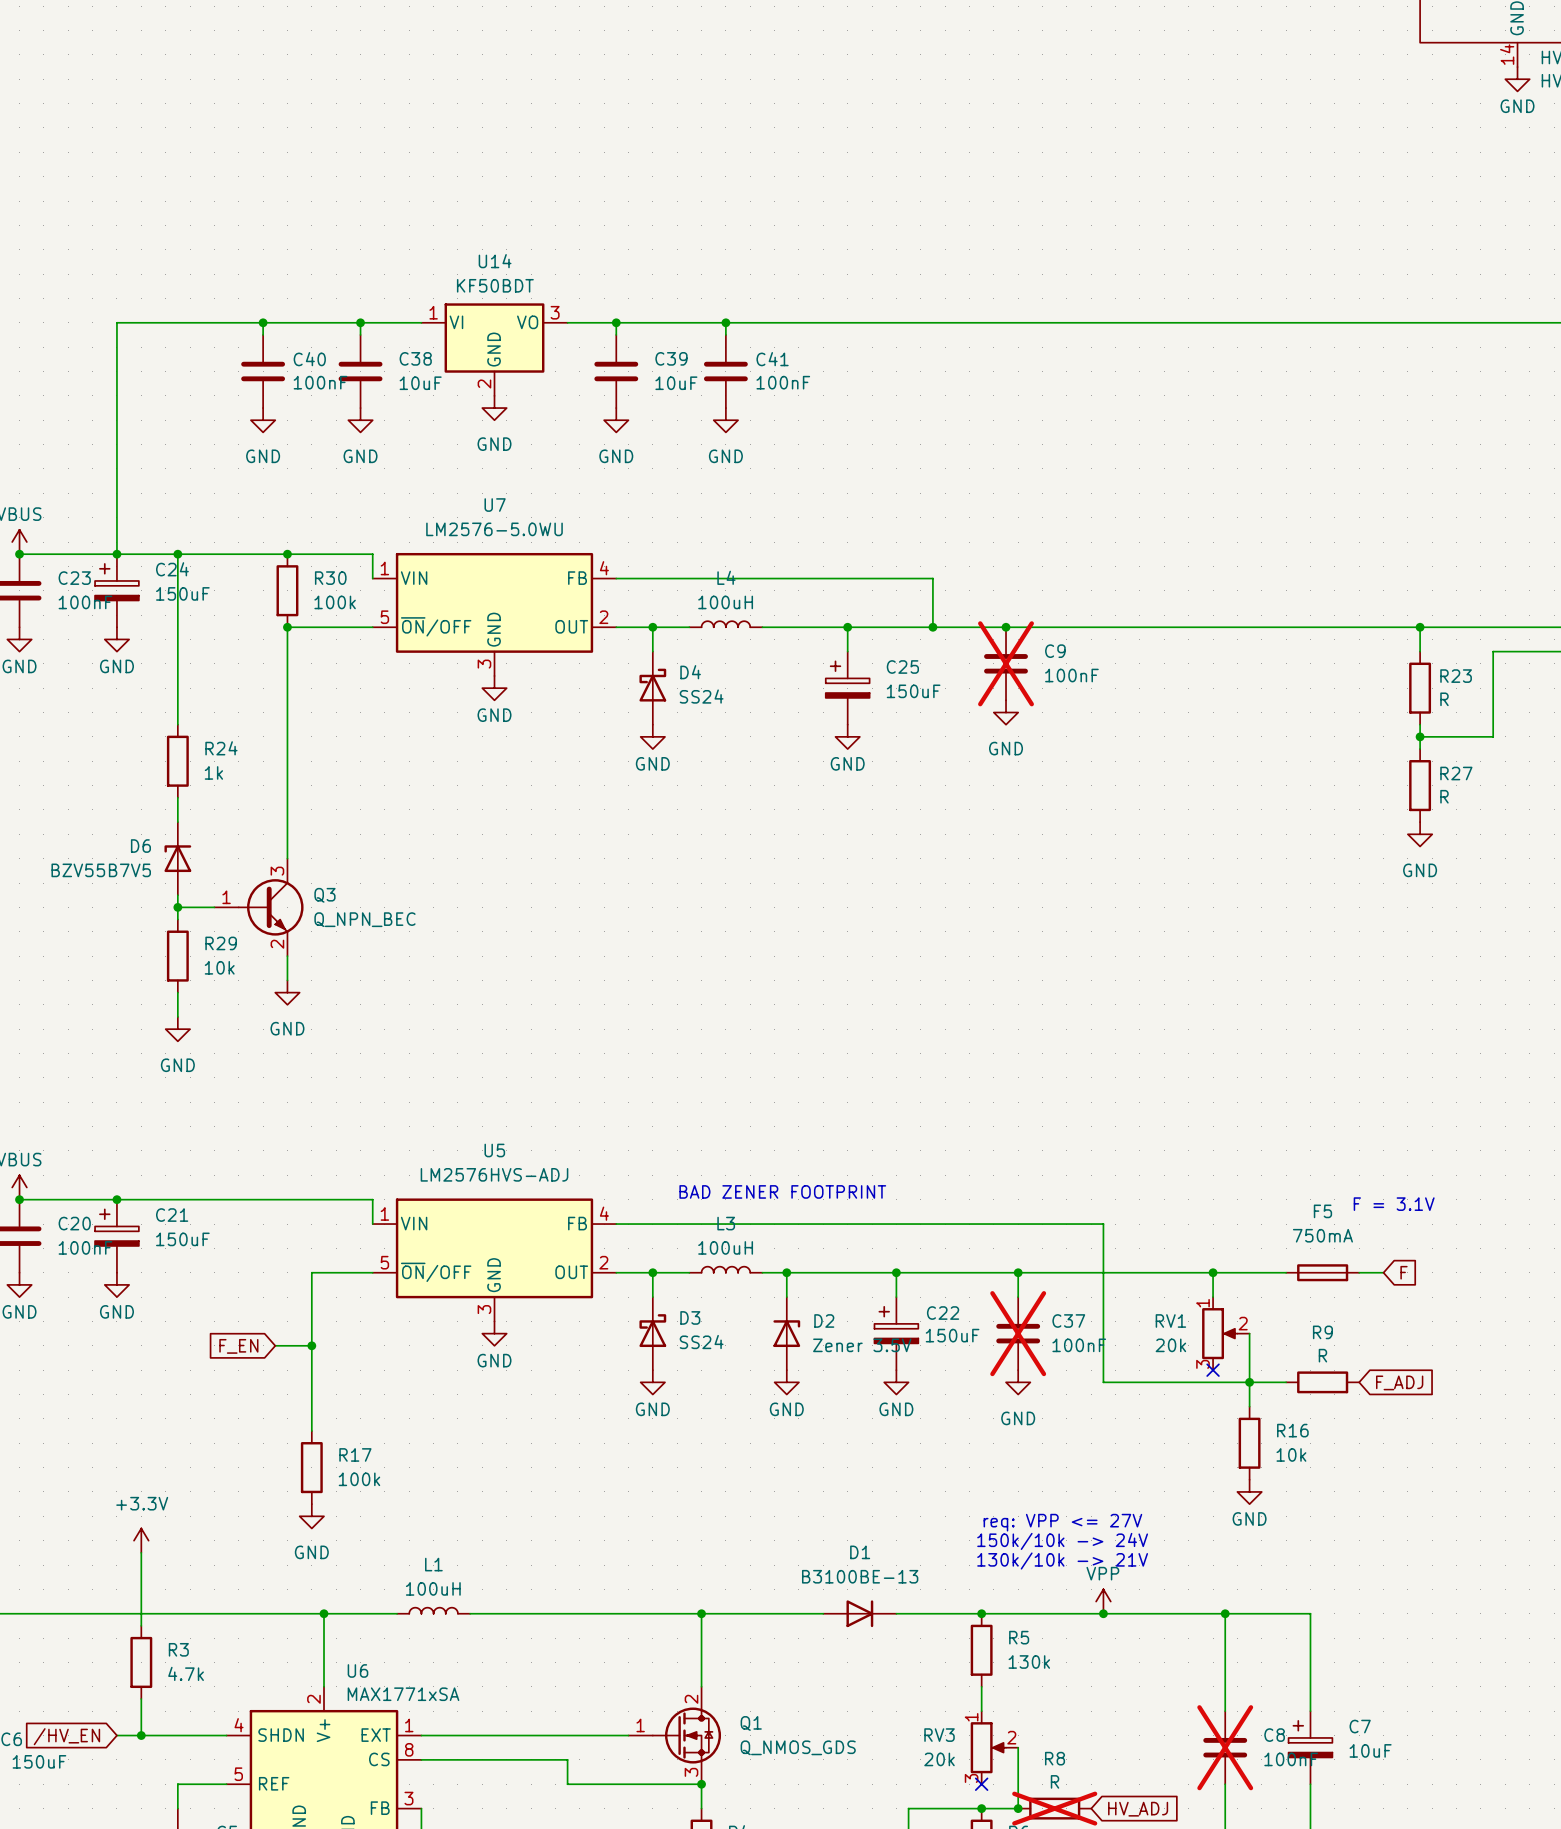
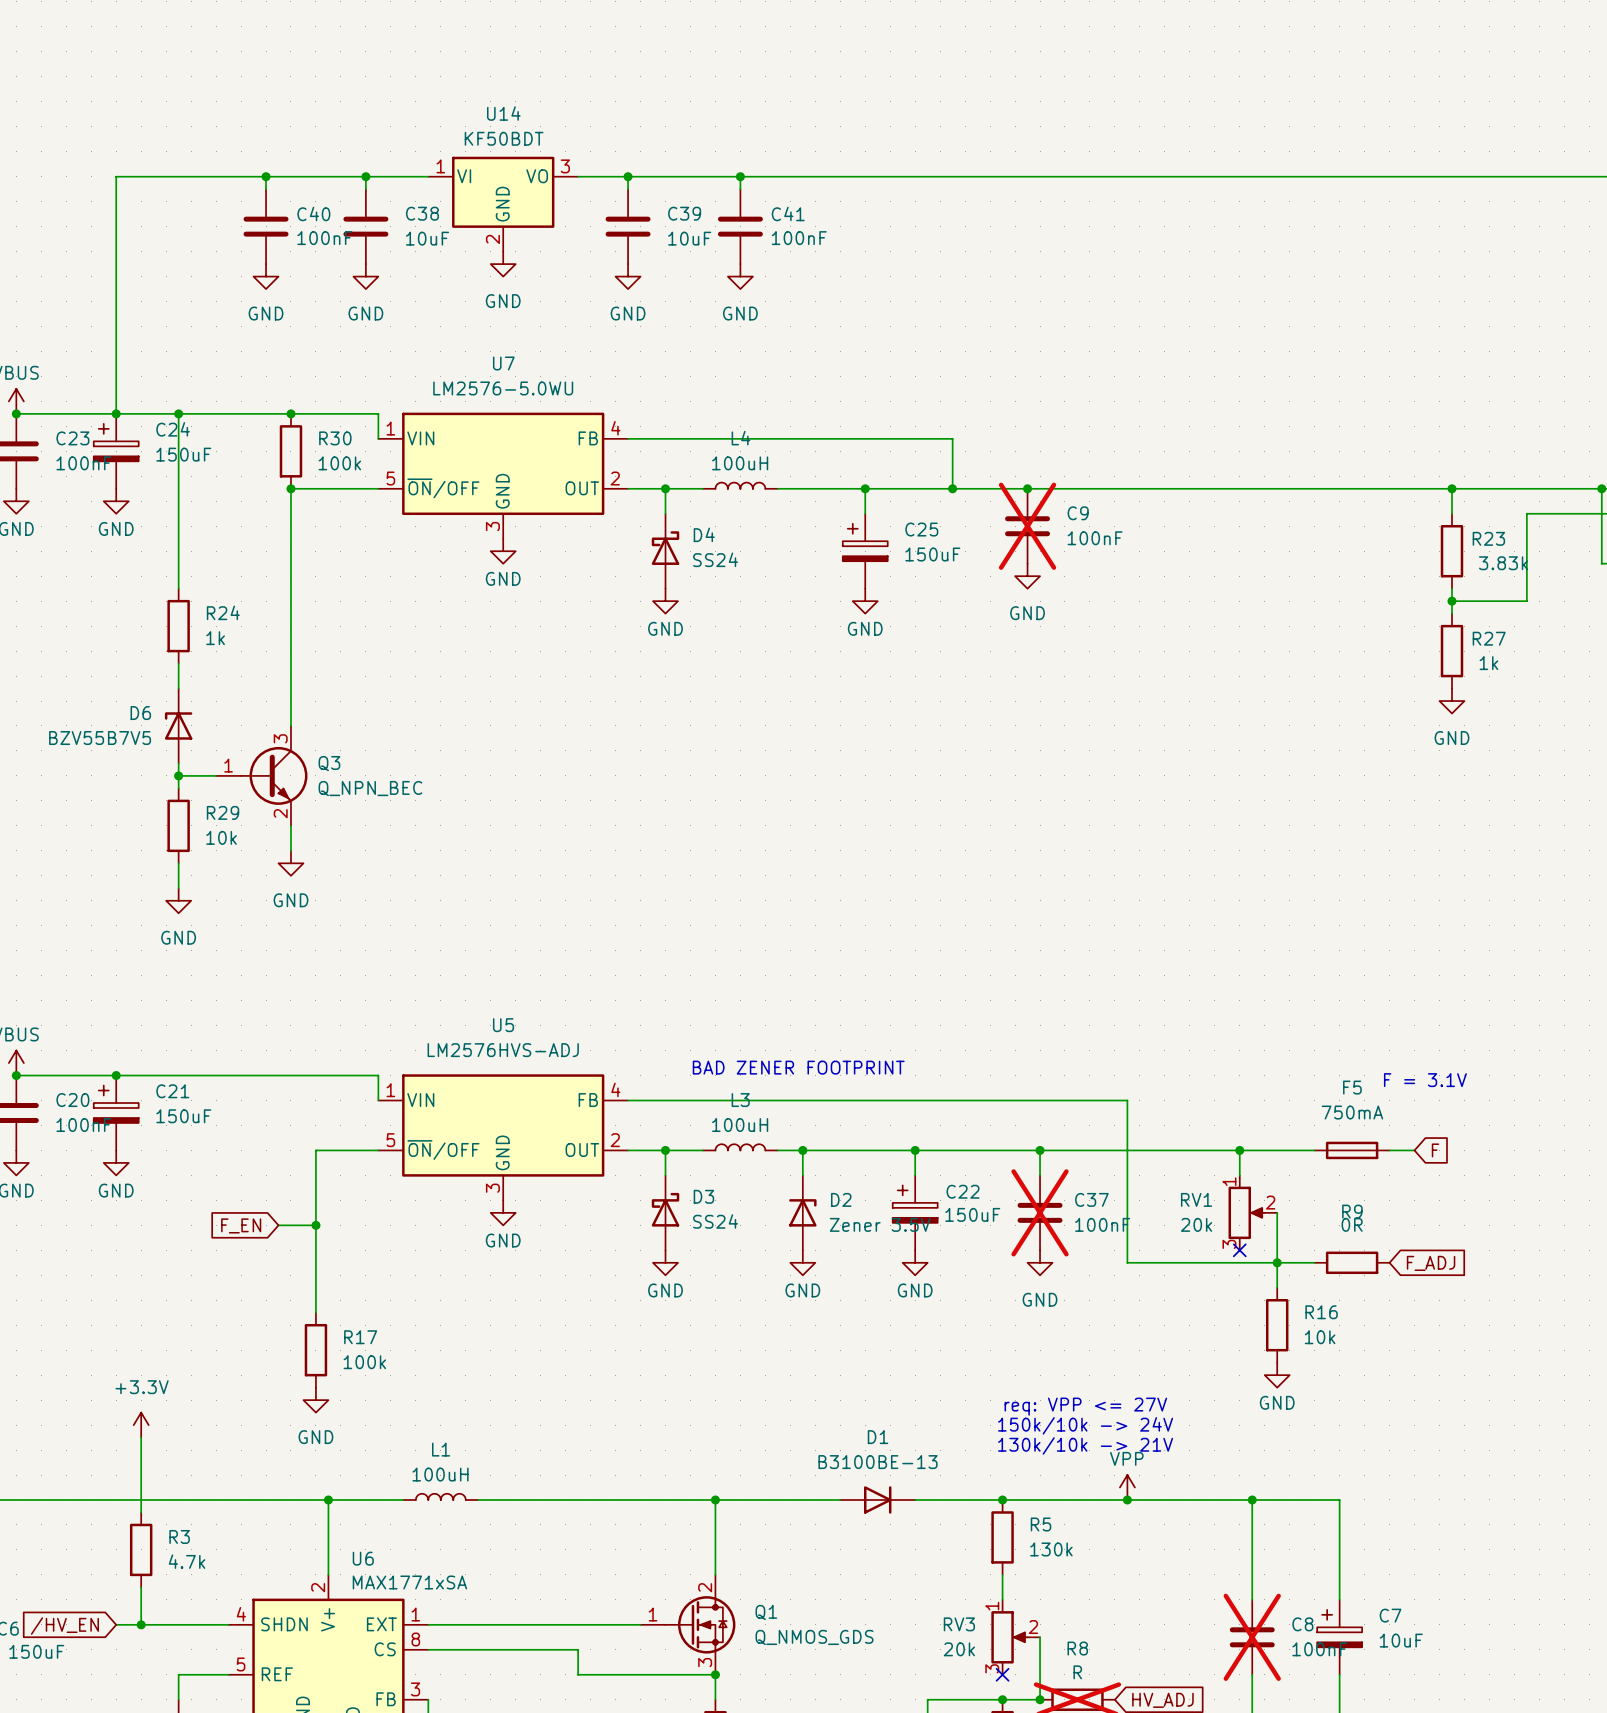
R23 value: R (1444, 699) -> 3.83k (1503, 563)
R27 value: R (1444, 796) -> 1k (1488, 663)
R9 value: R (1322, 1355) -> 0R (1352, 1224)

